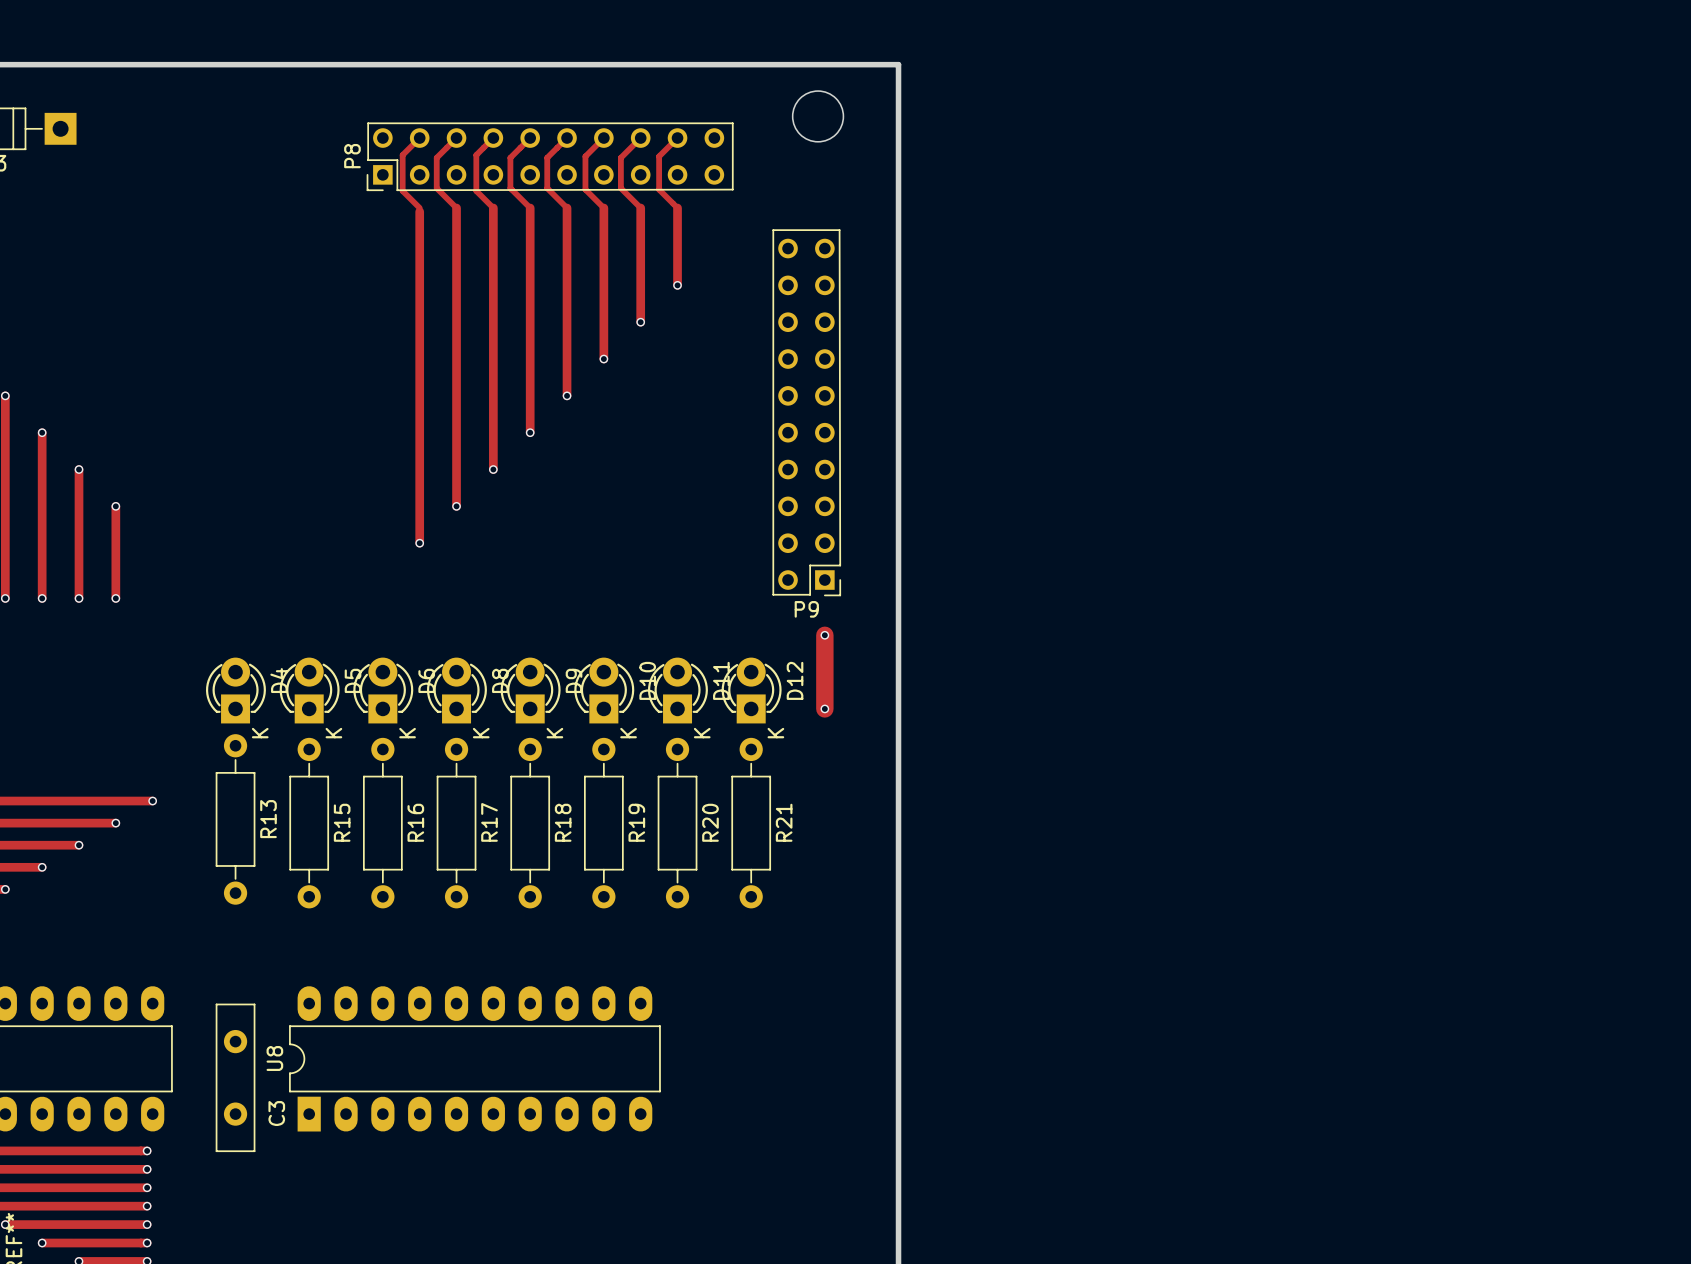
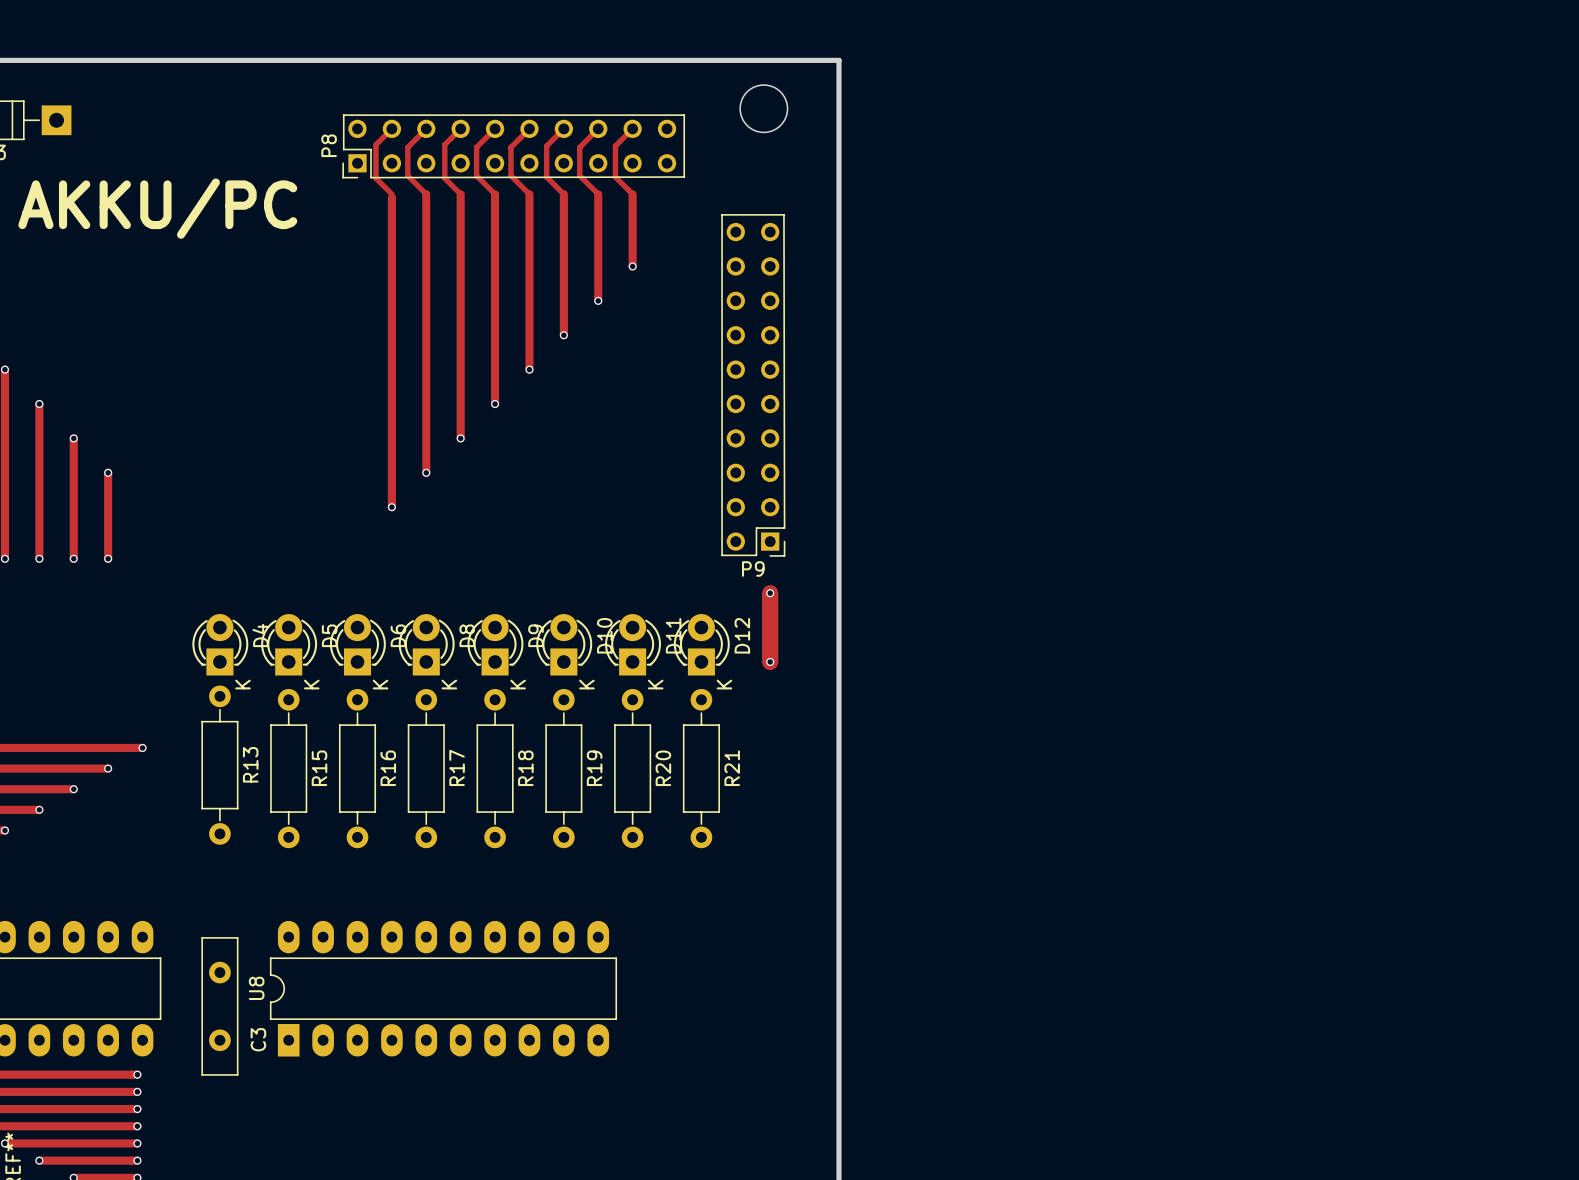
text: none -> AKKU/PC (157, 208)

